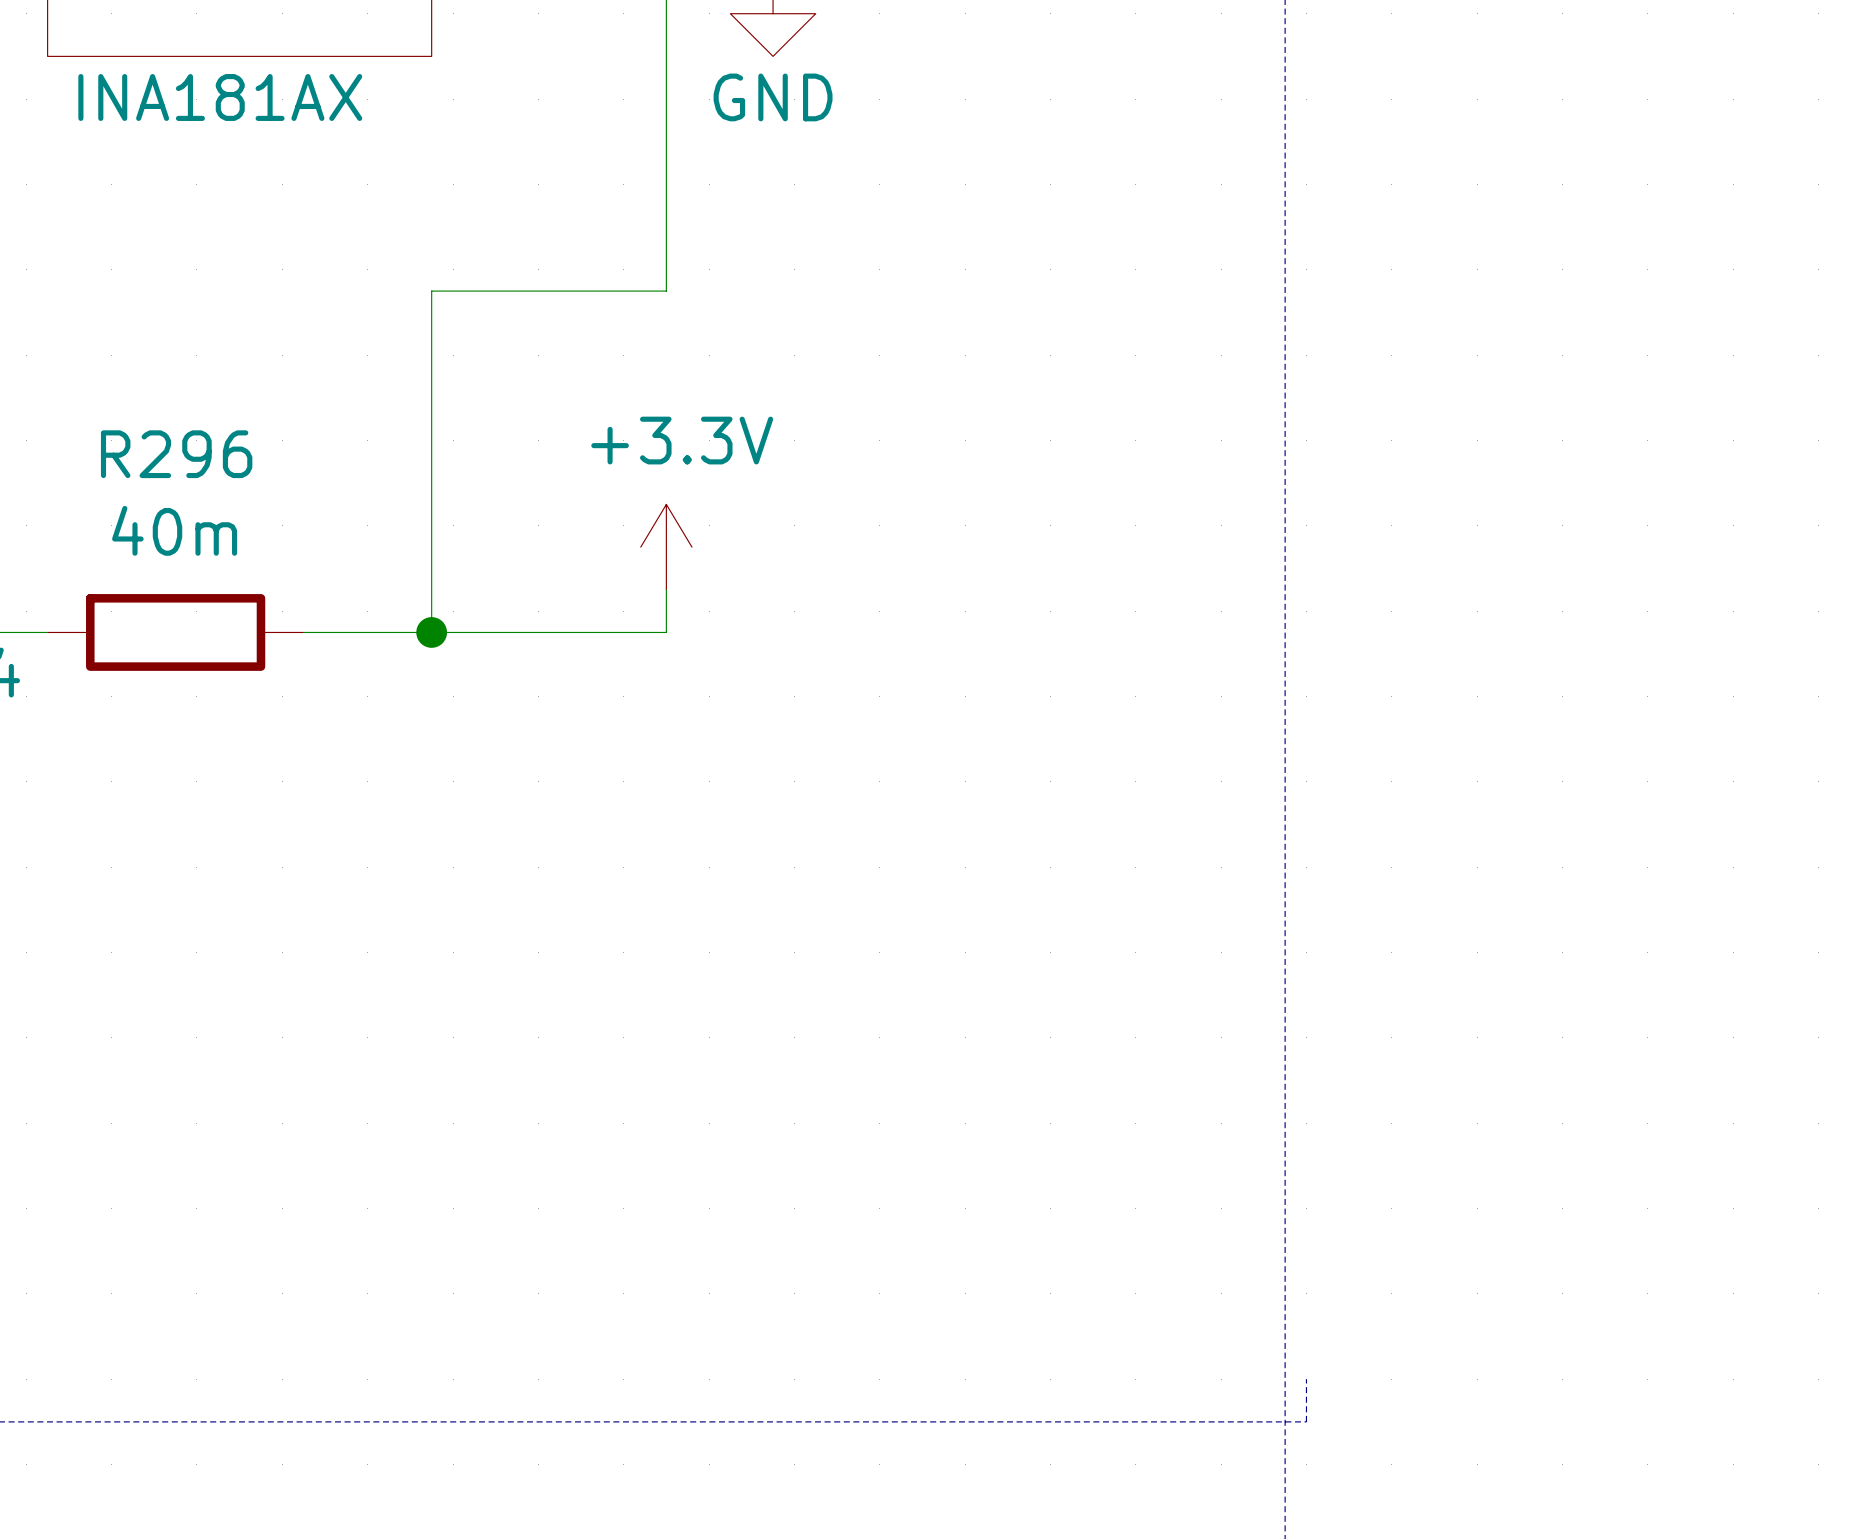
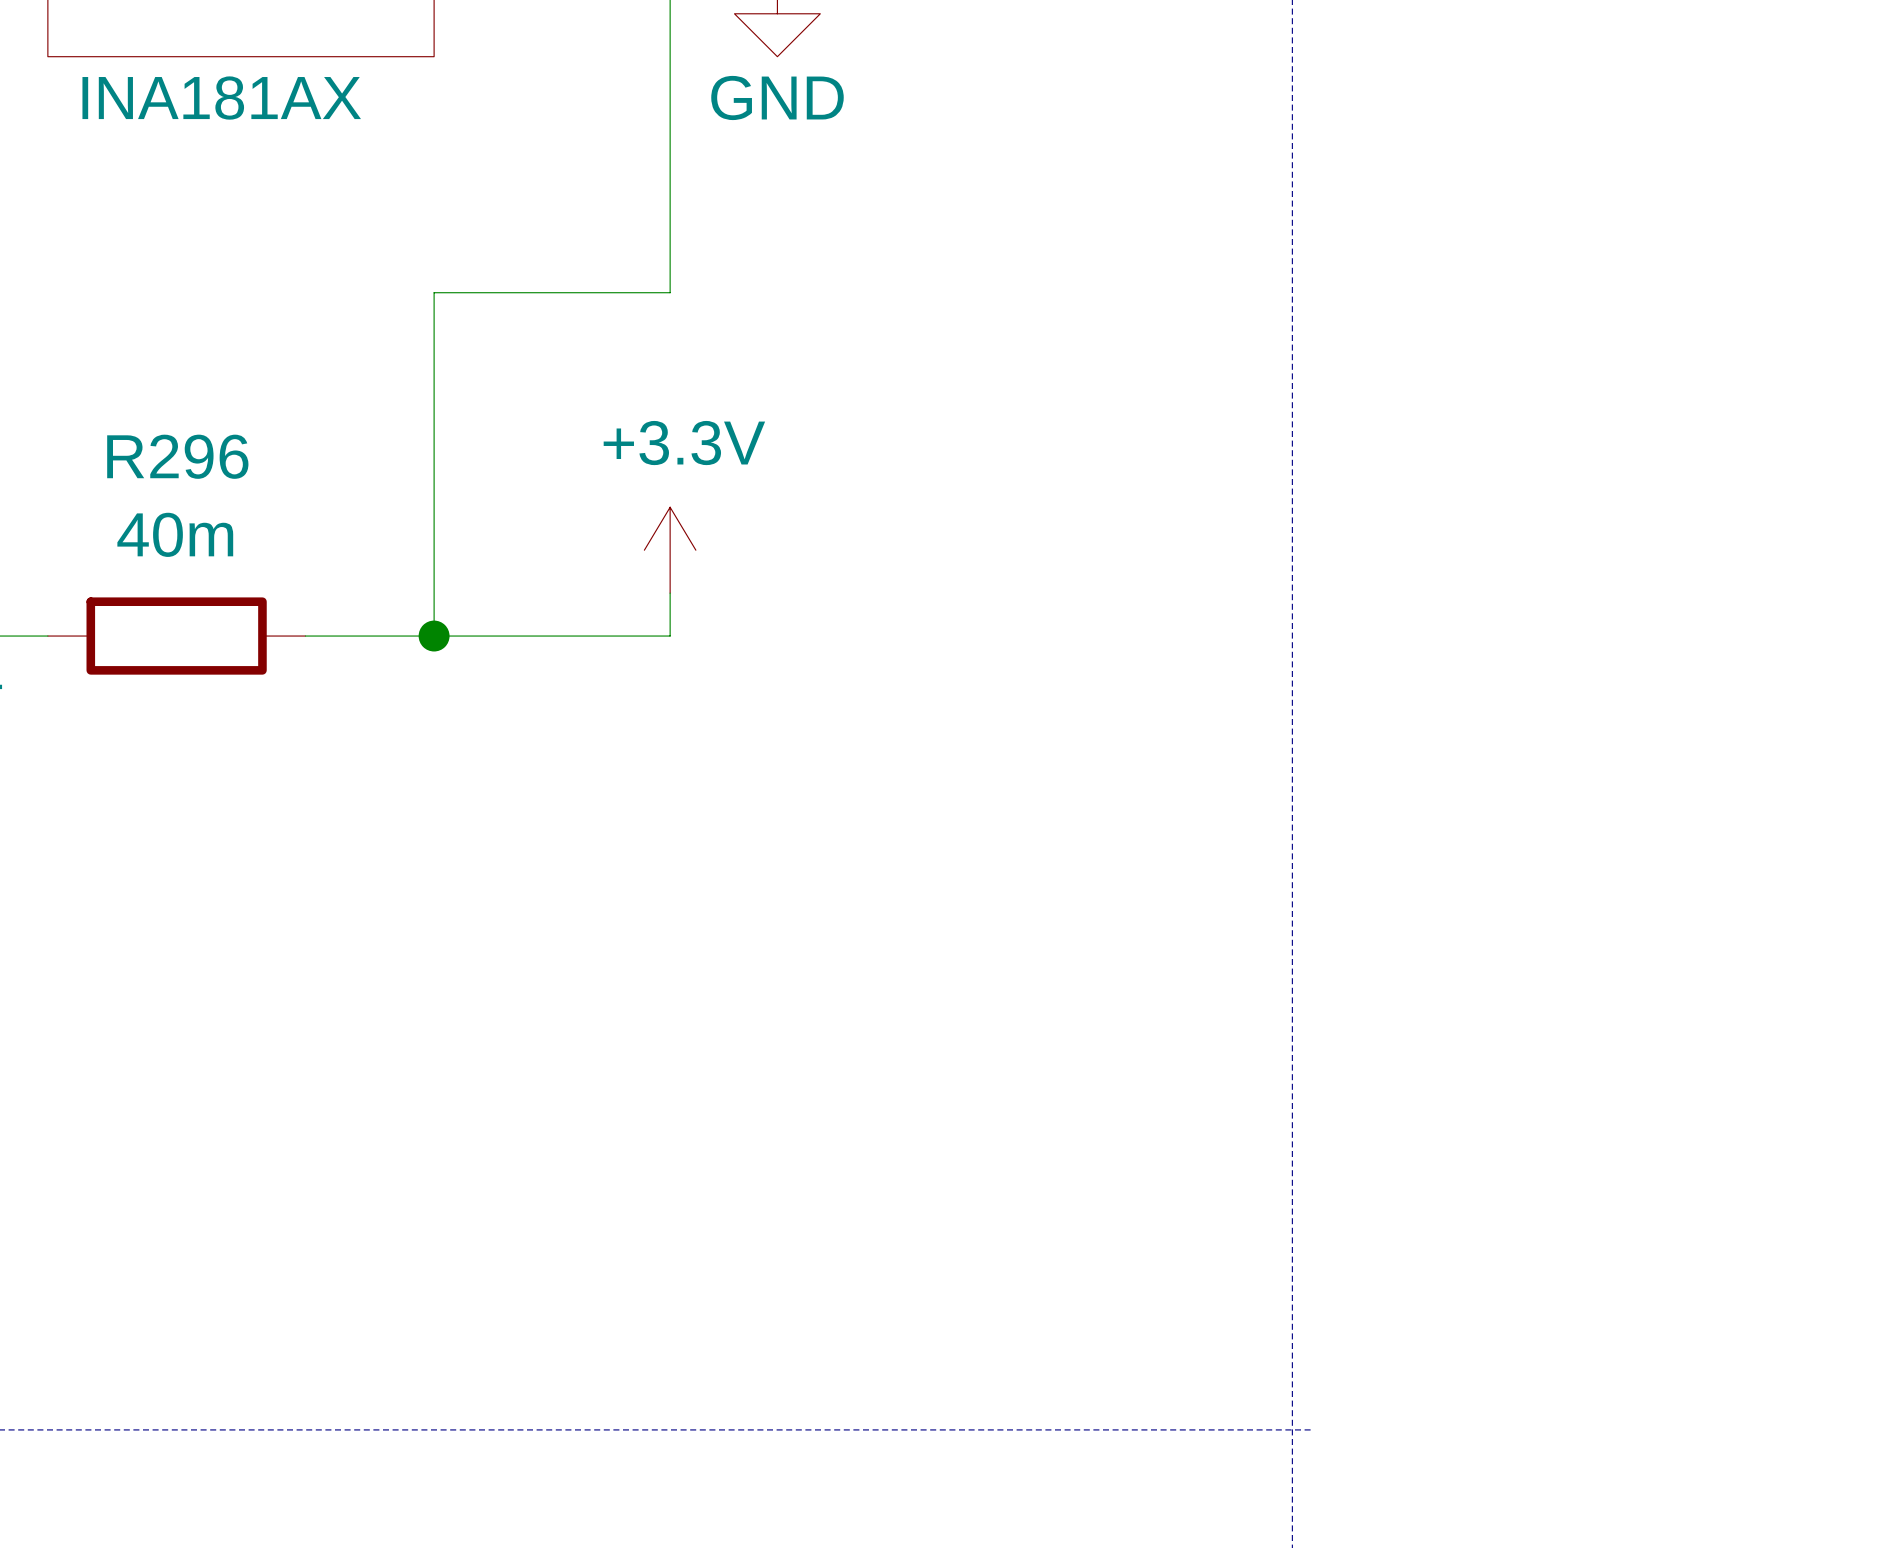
line: (1306, 1379) (1306, 1421) -> none

